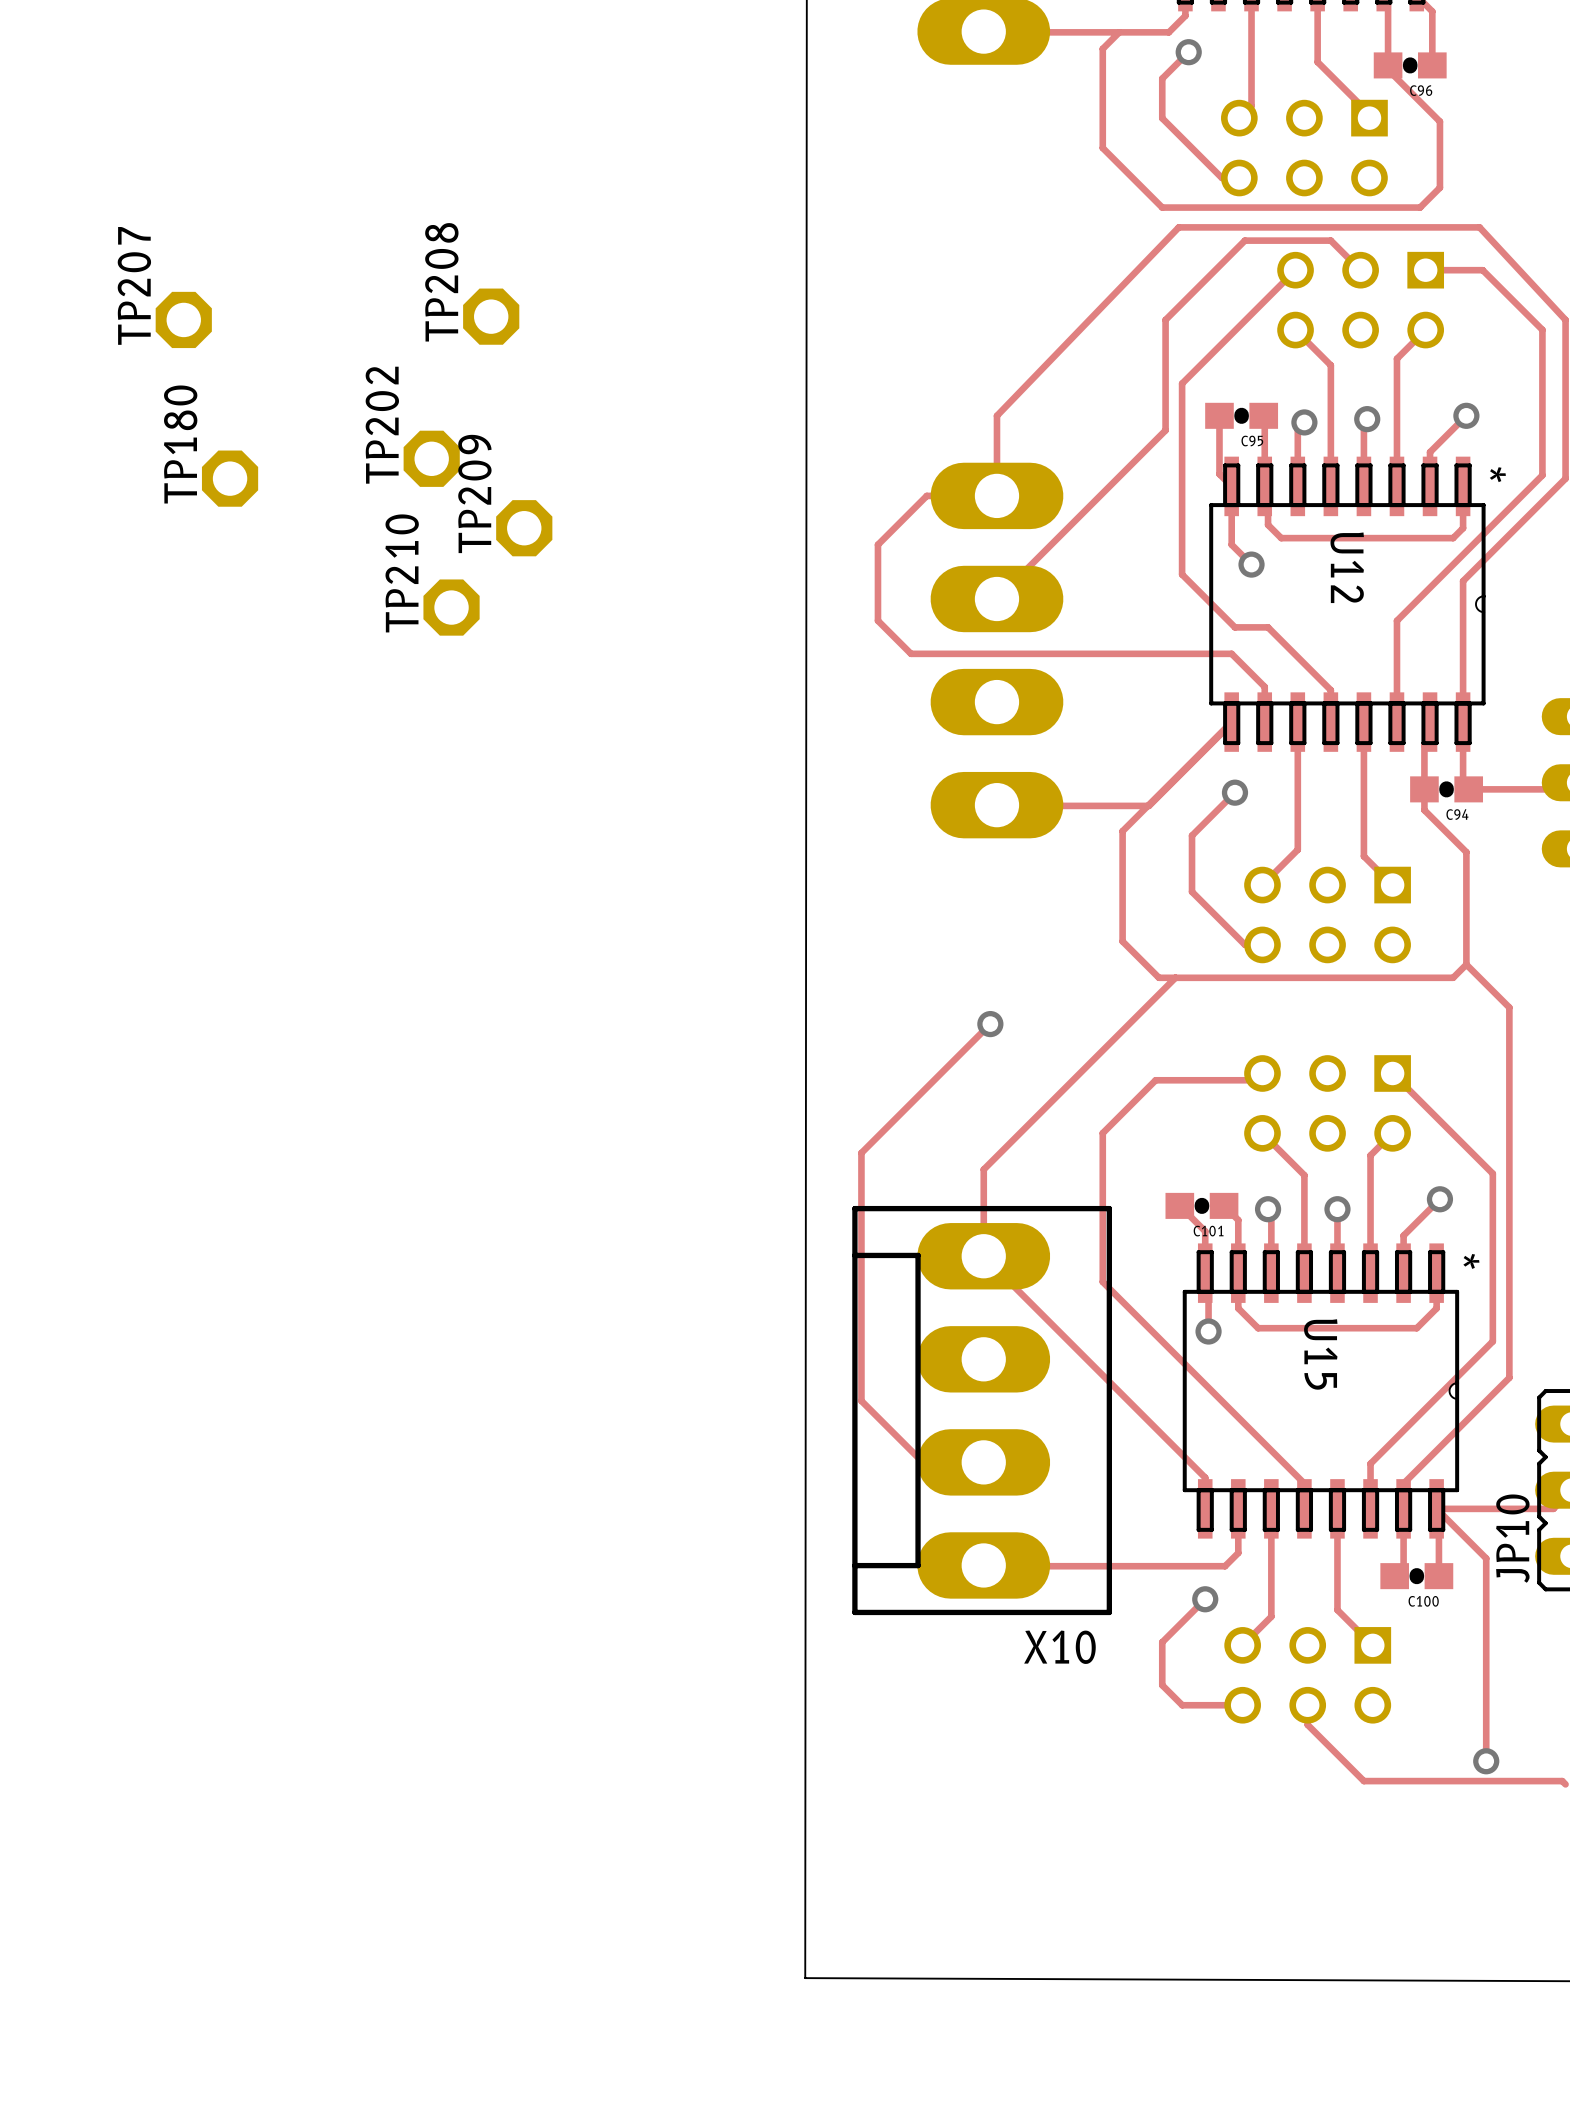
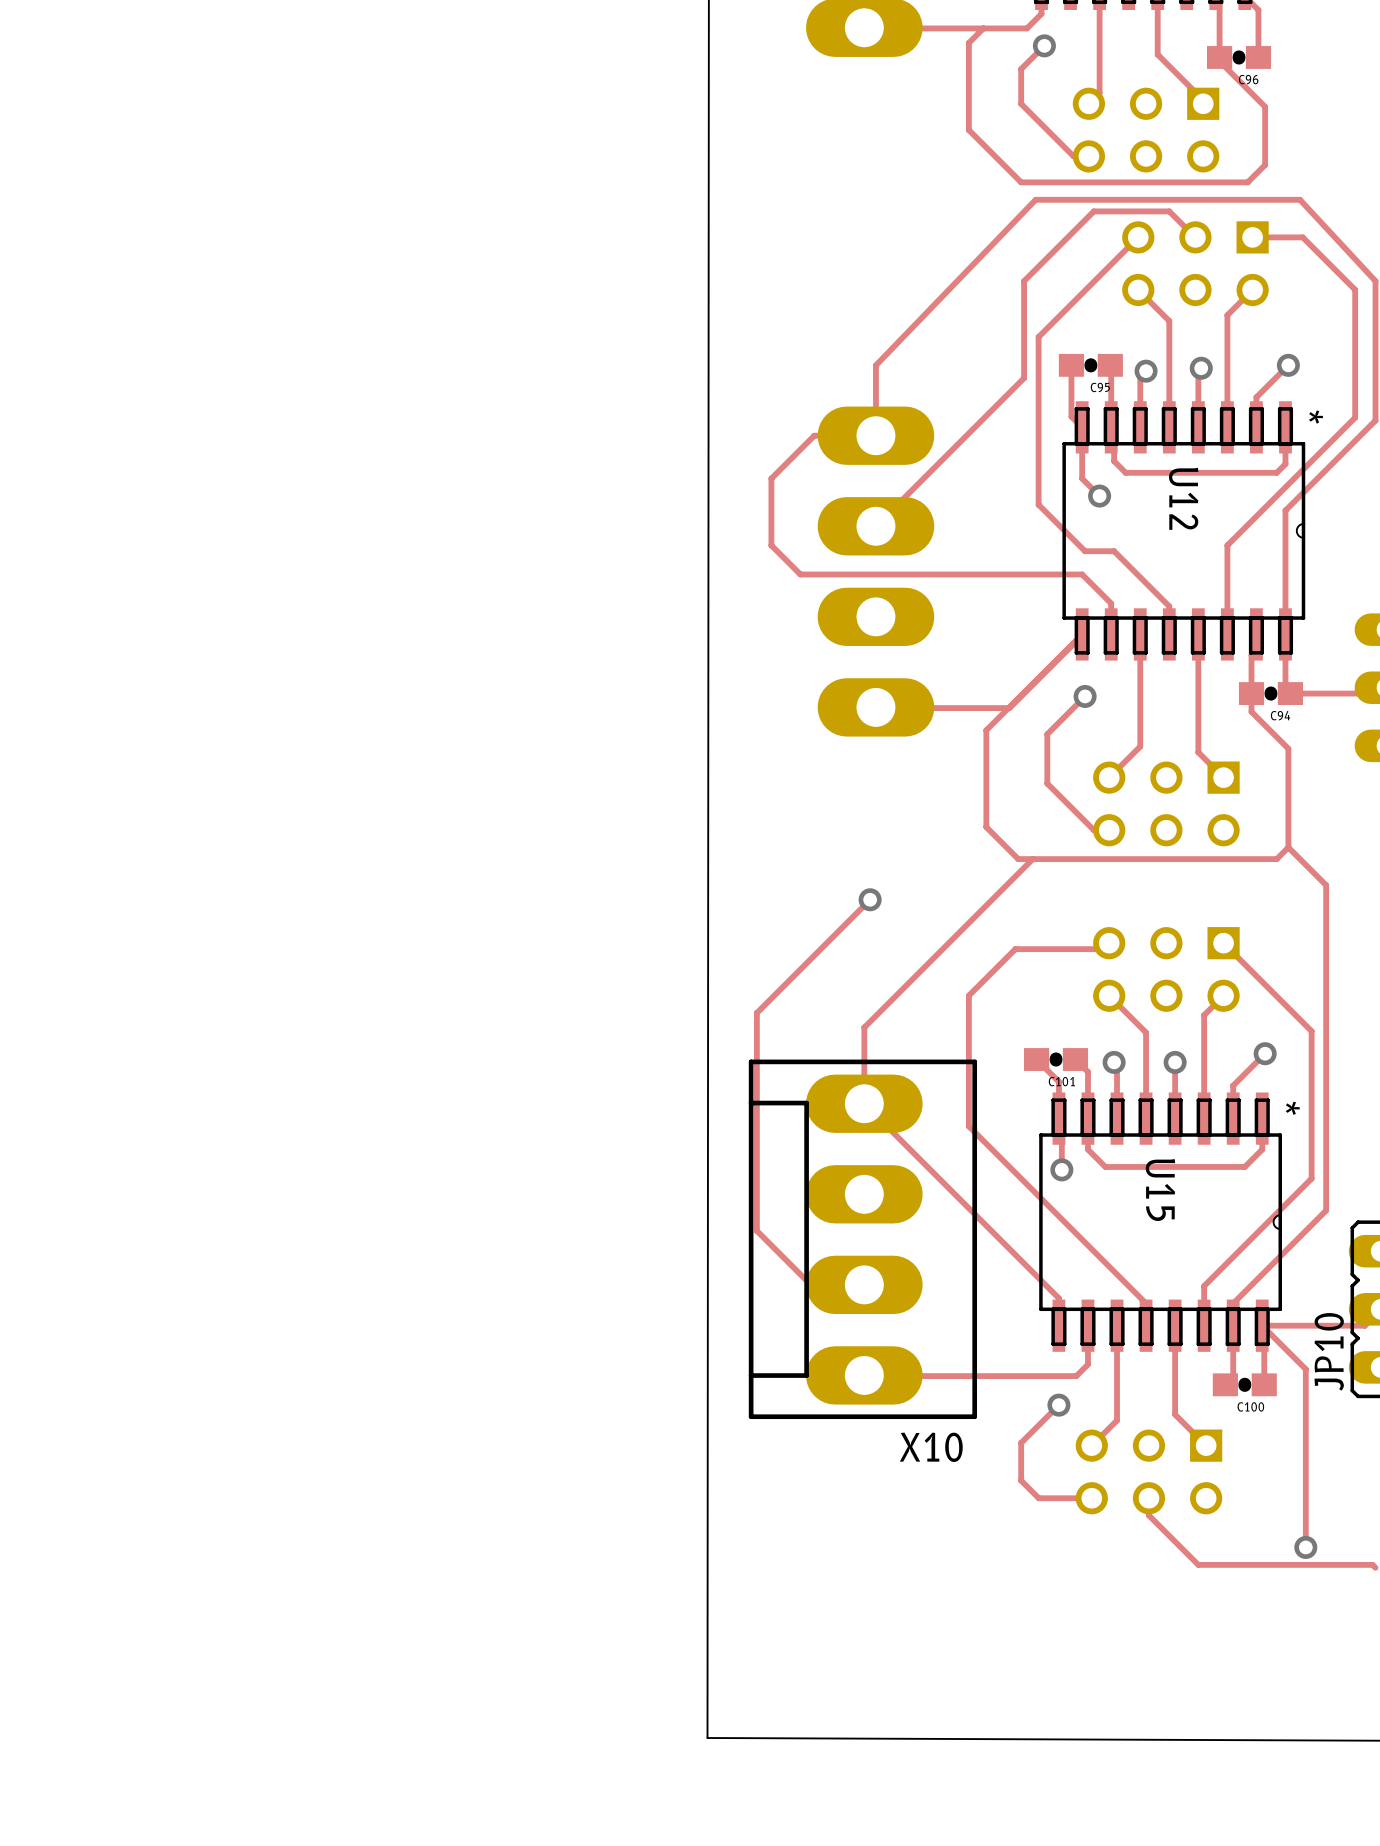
TP208: (491, 316) -> none
TP207: (183, 319) -> none
TP202: (431, 458) -> none
TP180: (230, 478) -> none
TP209: (524, 528) -> none
TP210: (451, 607) -> none

